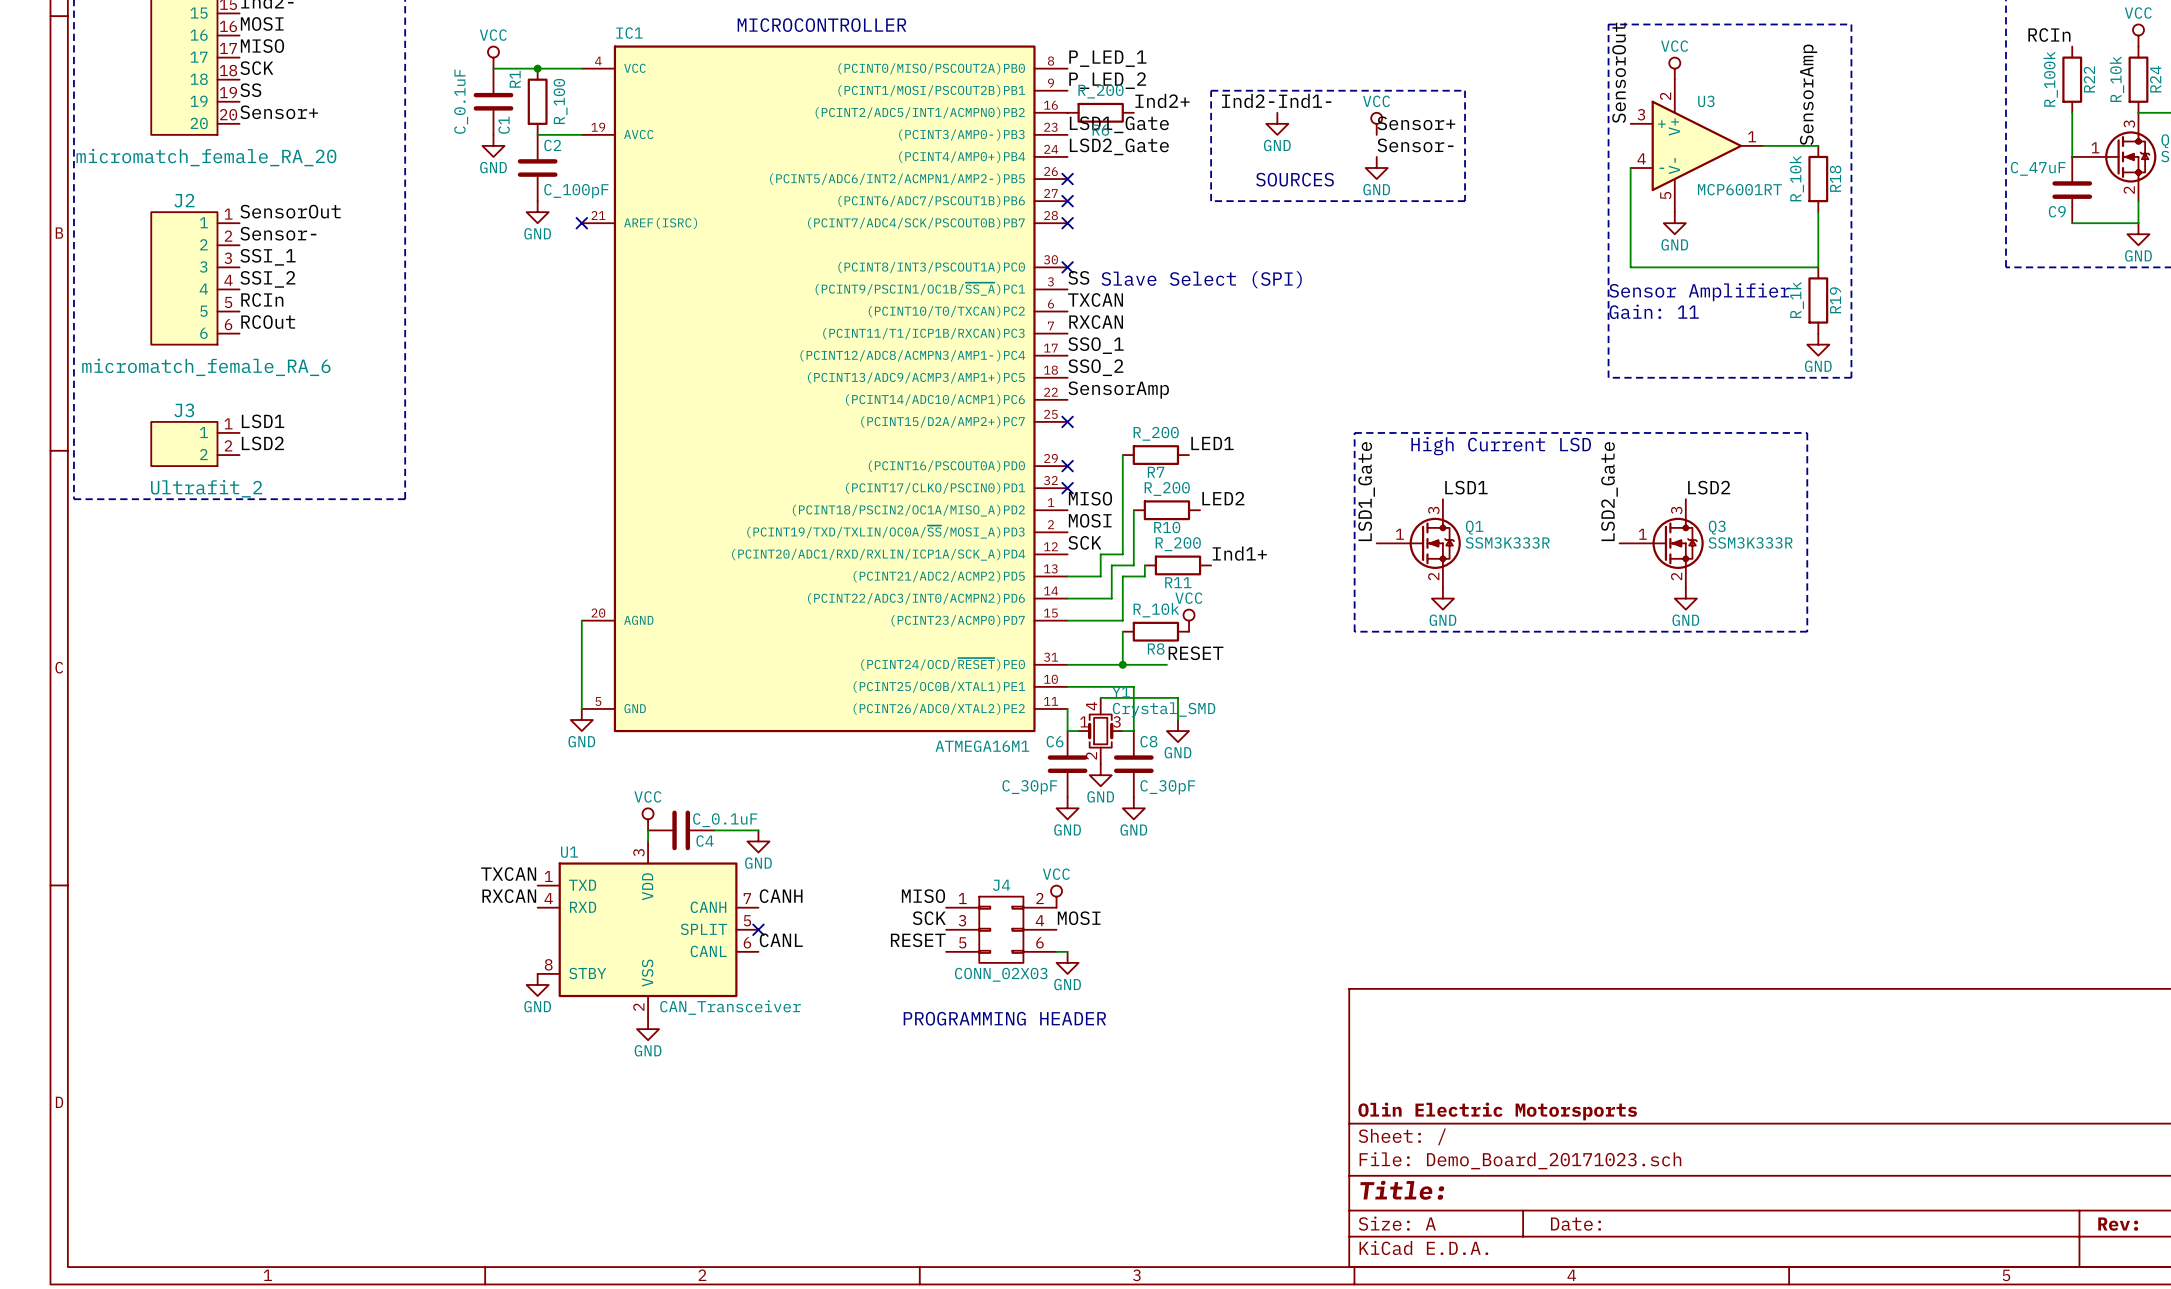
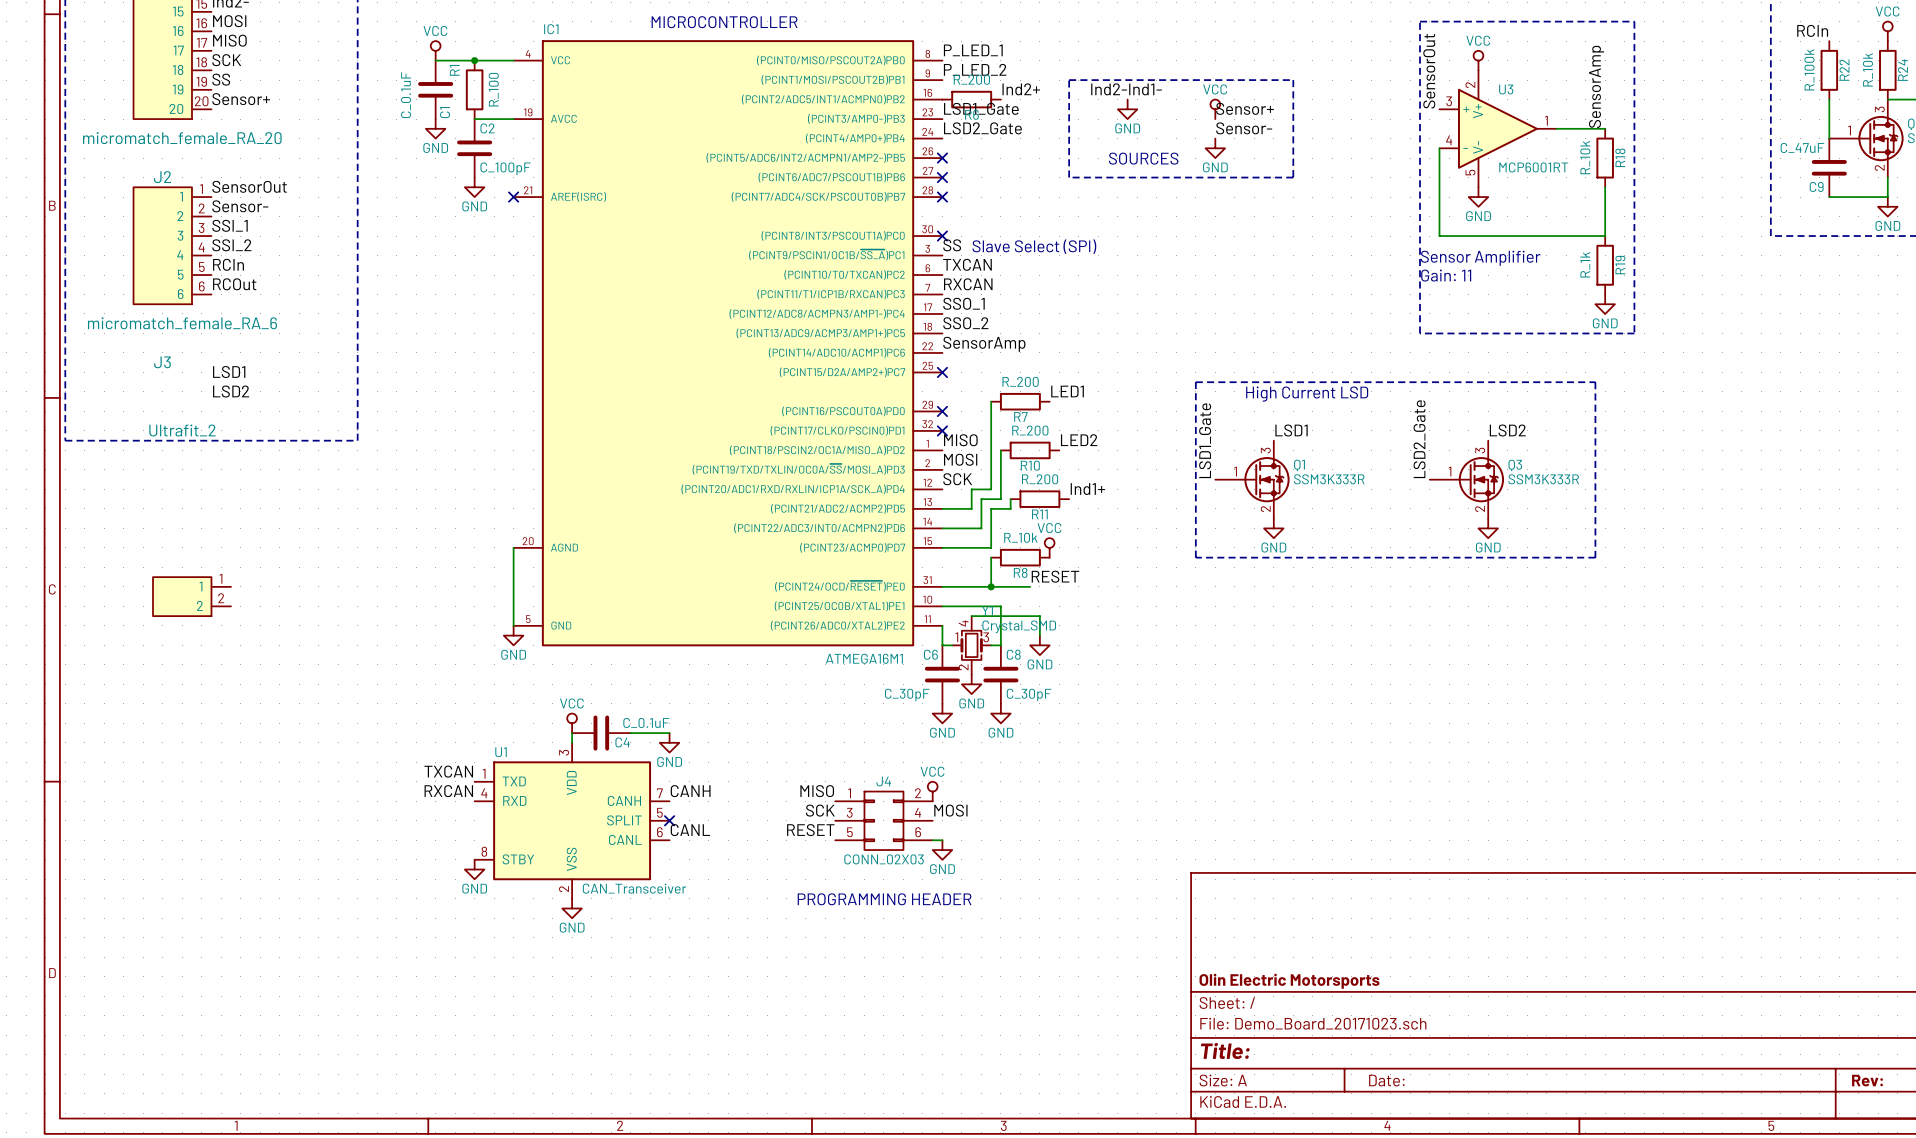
J3 position: (195, 444) -> (191, 596)

